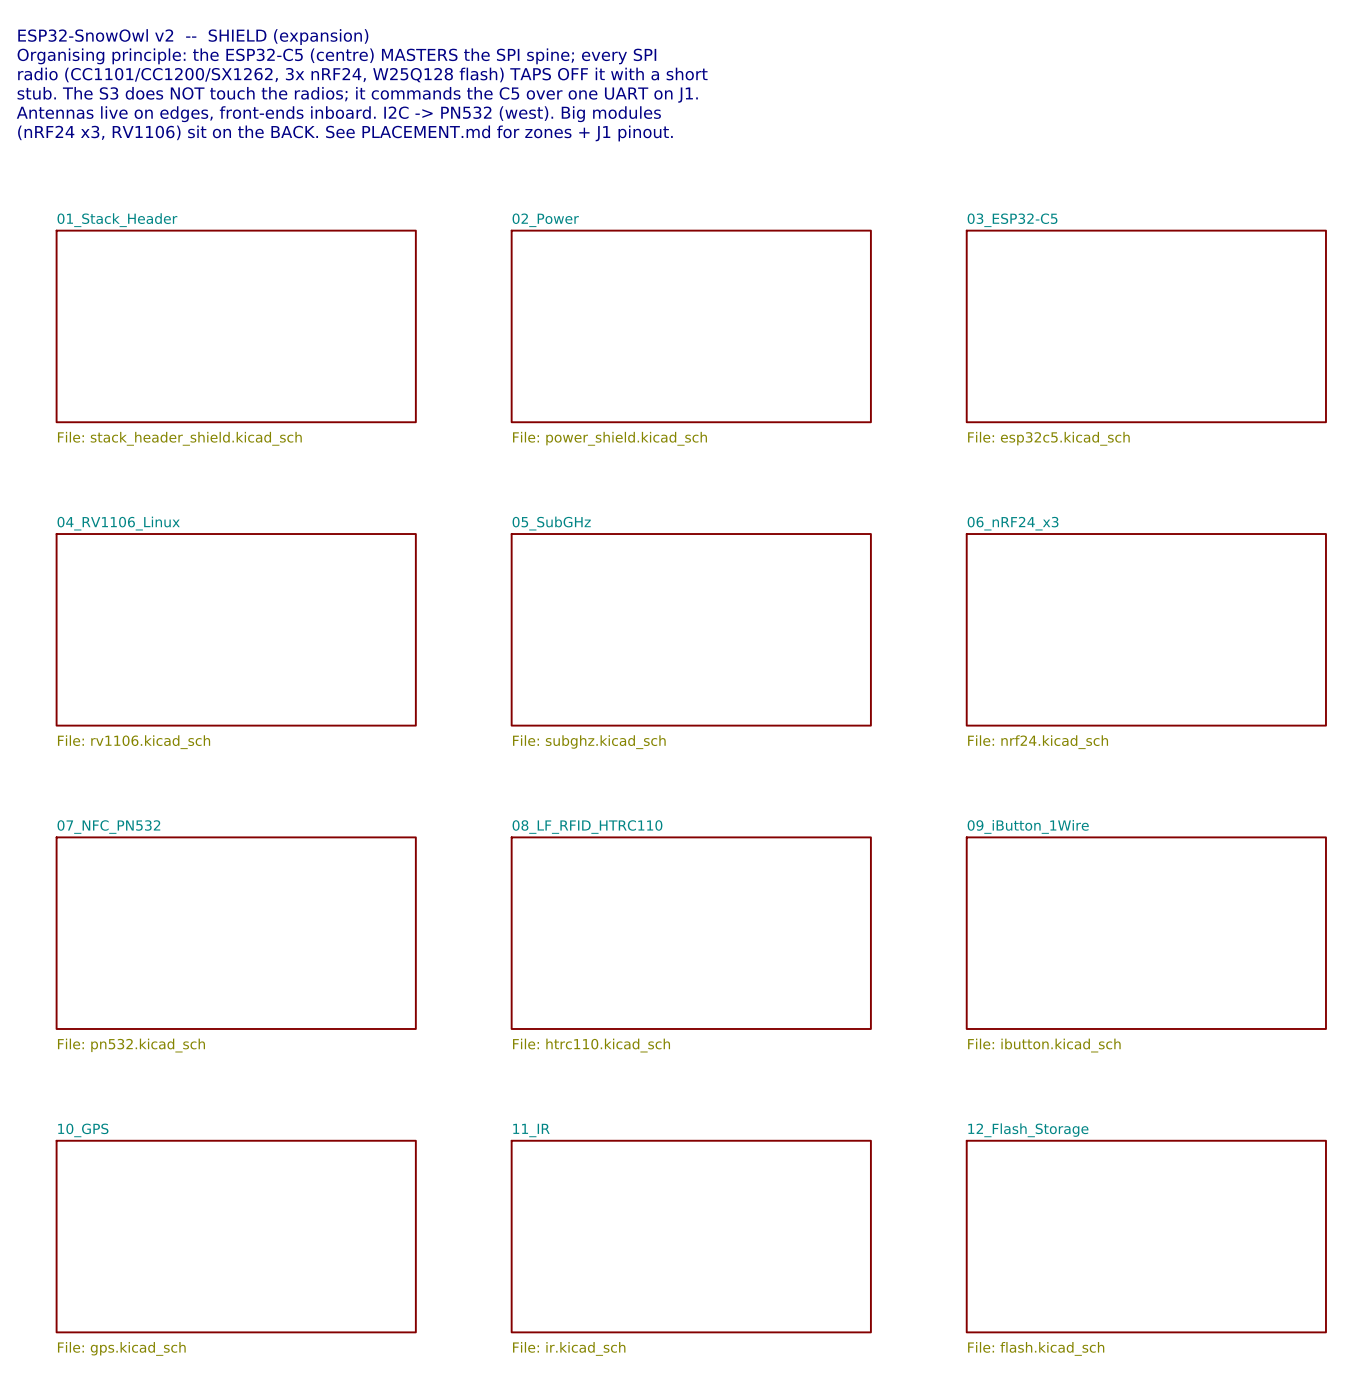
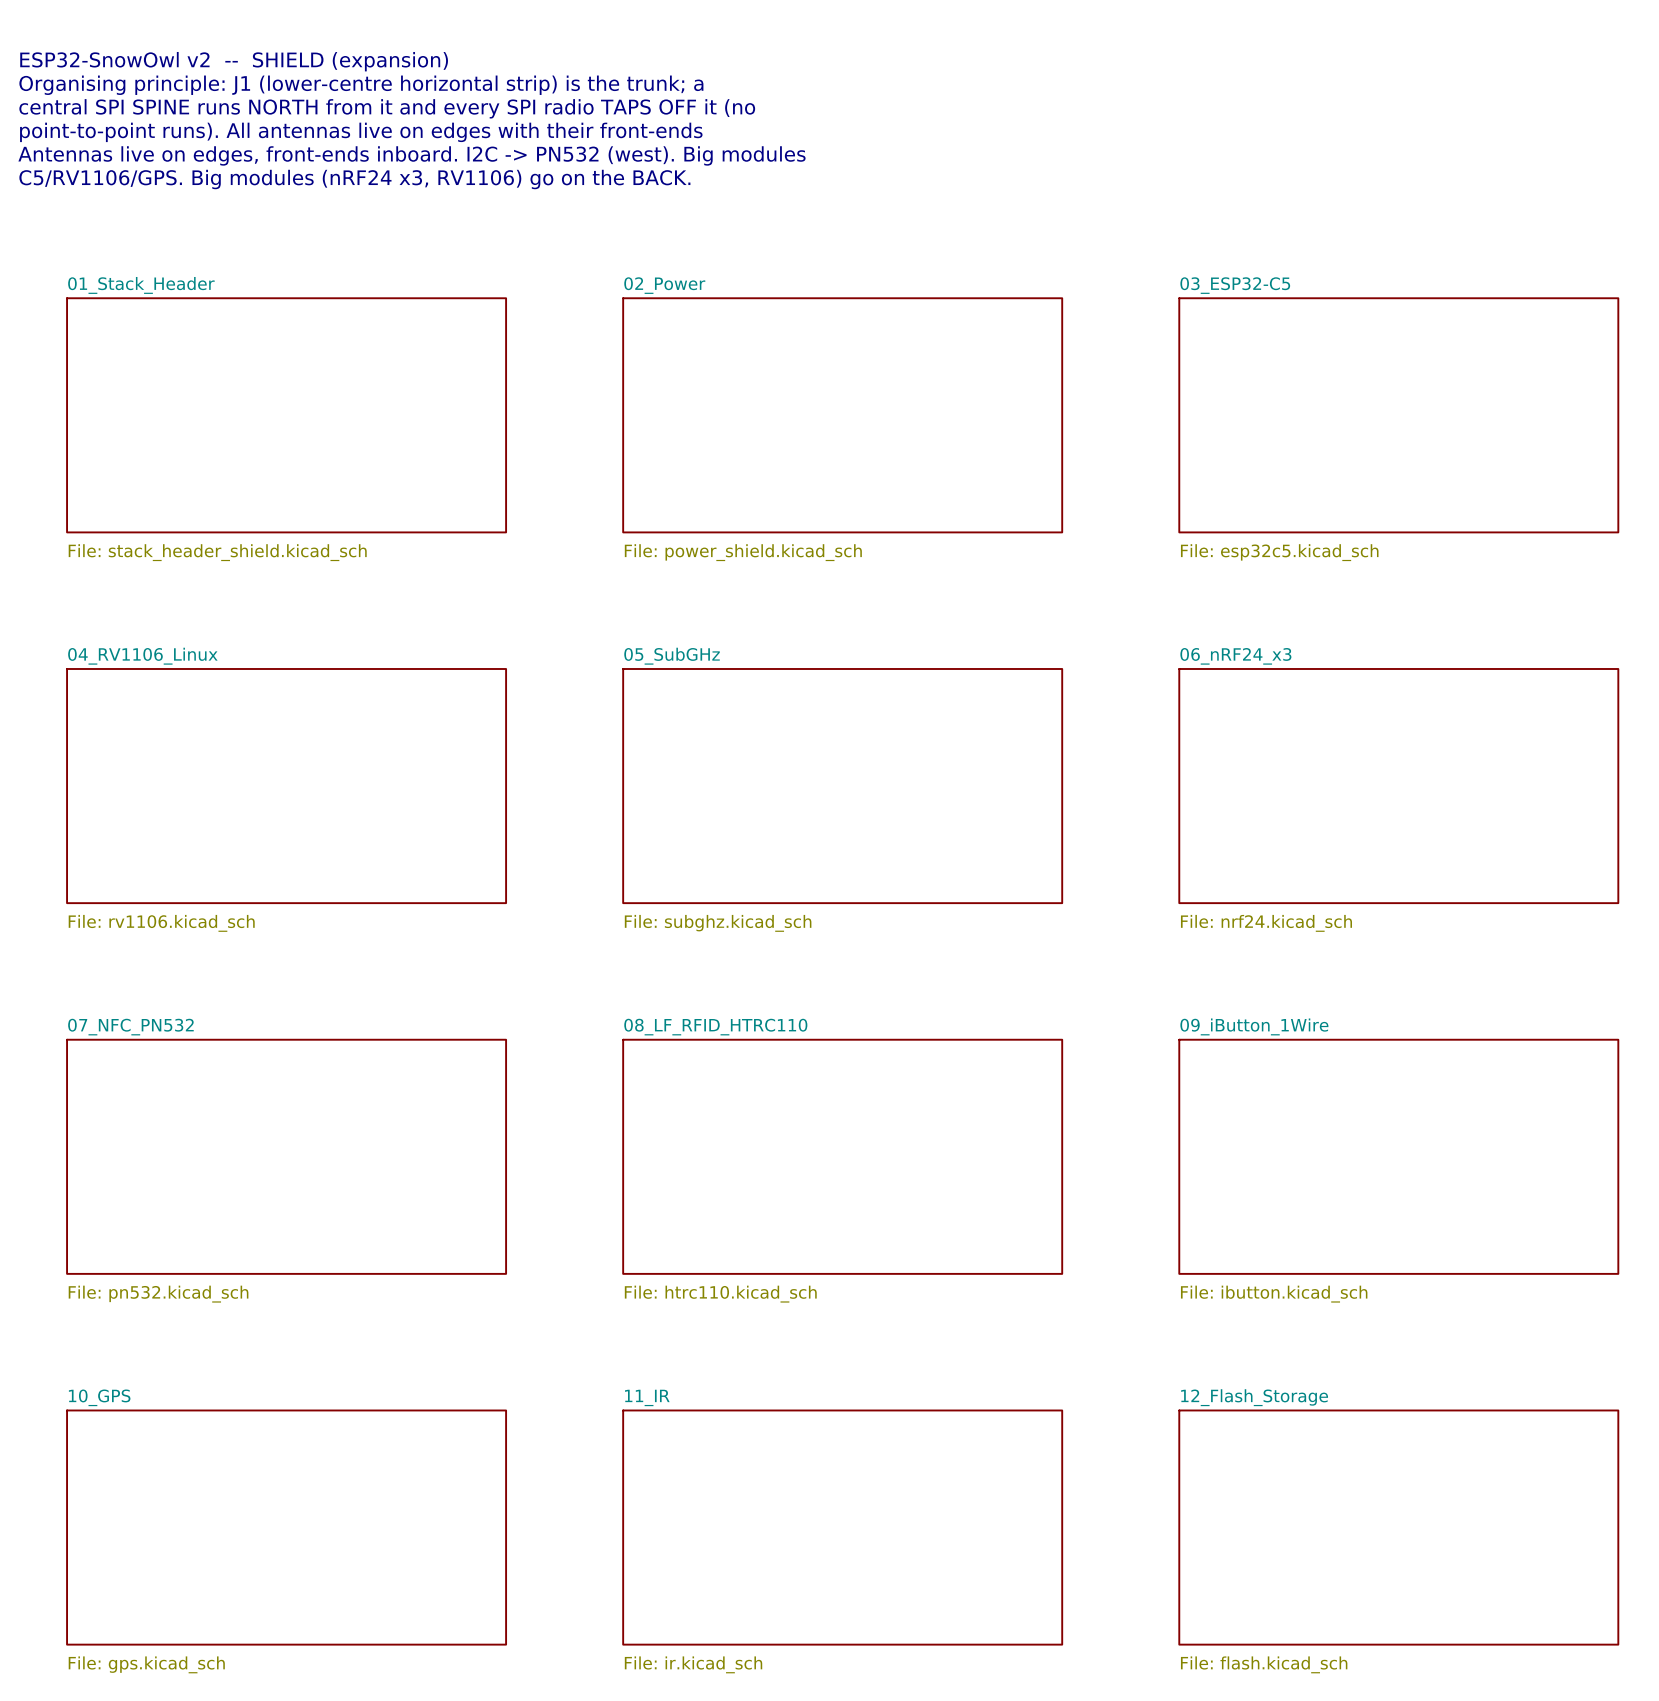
text: Organising principle: the ESP32-C5 (centre) MASTERS the SPI spine; every SPI (336, 56) -> Organising principle: J1 (lower-centre horizontal strip) is the trunk; a (361, 85)
text: radio (CC1101/CC1200/SX1262, 3x nRF24, W25Q128 flash) TAPS OFF it with a short (362, 74) -> central SPI SPINE runs NORTH from it and every SPI radio TAPS OFF it (no (387, 108)
text: stub. The S3 does NOT touch the radios; it commands the C5 over one UART on J1. (357, 94) -> point-to-point runs). All antennas live on edges with their front-ends (361, 132)
text: (nRF24 x3, RV1106) sit on the BACK. See PLACEMENT.md for zones + J1 pinout. (345, 133) -> C5/RV1106/GPS. Big modules (nRF24 x3, RV1106) go on the BACK. (354, 179)

